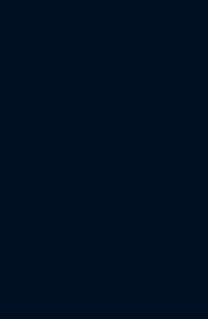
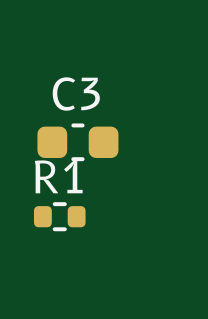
C3: none -> (77, 142)
R1: none -> (59, 216)

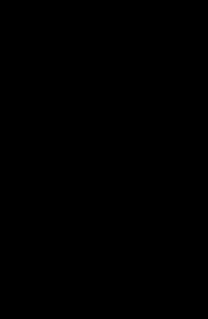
C3: (77, 142) -> none
R1: (59, 216) -> none

